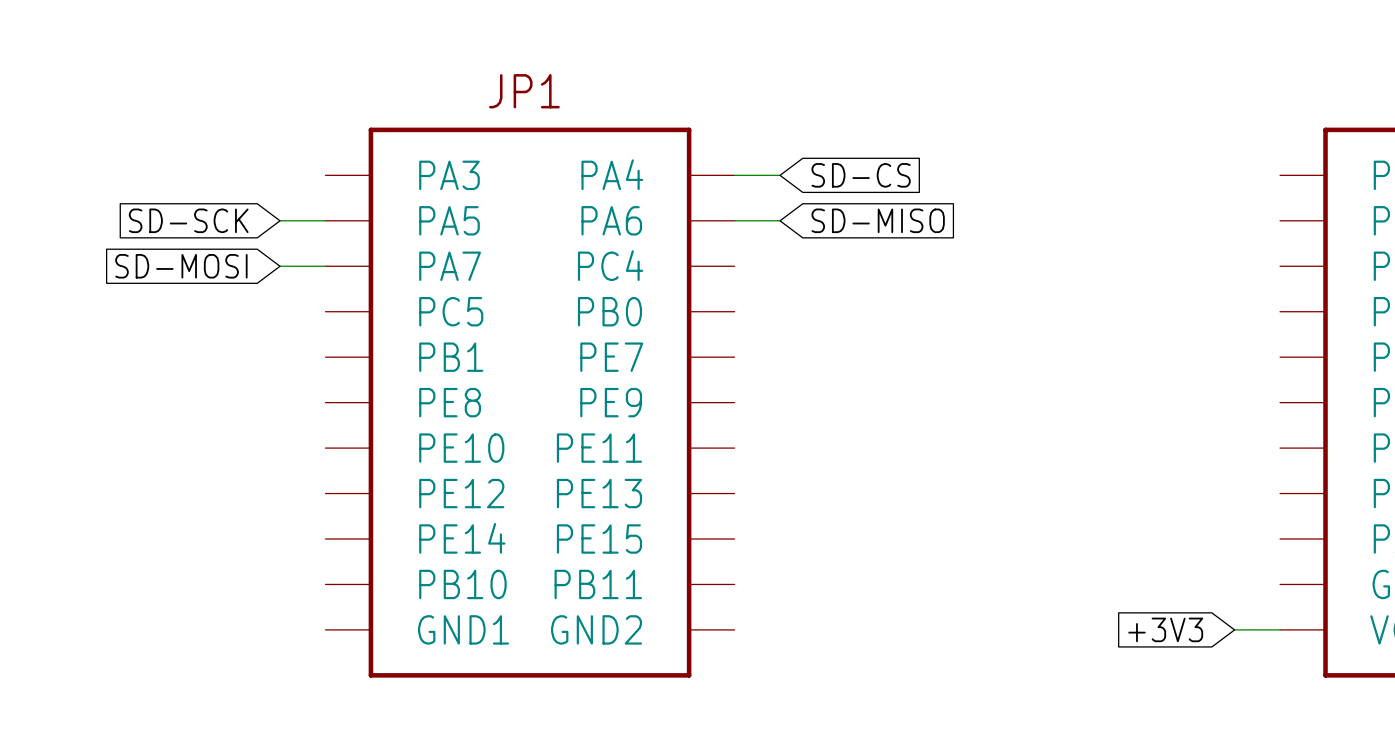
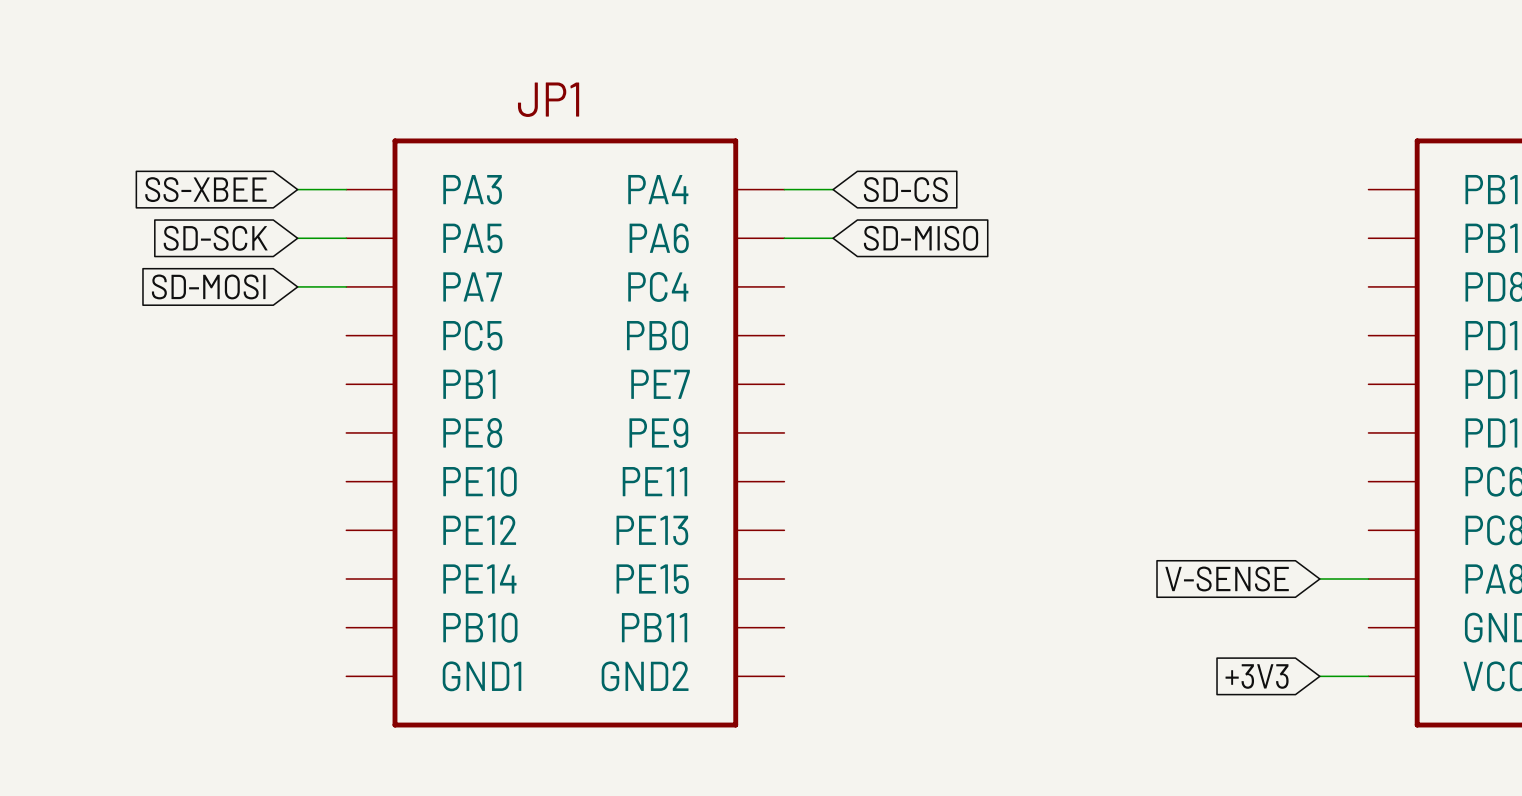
global label: none -> SS-XBEE (205, 189)
wire: none -> (297, 189) (346, 189)
global label: none -> V-SENSE (1227, 579)
wire: none -> (1319, 579) (1368, 579)

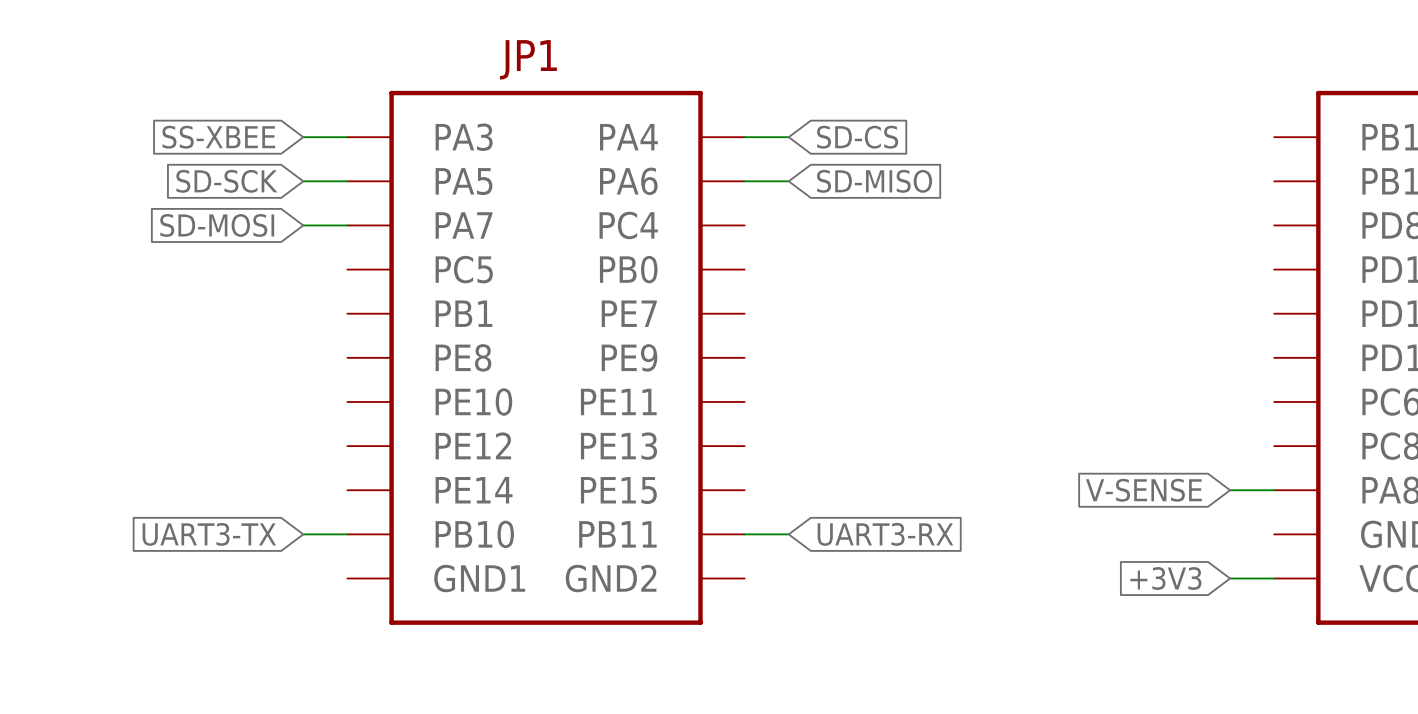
global label: none -> UART3-TX (209, 534)
wire: none -> (303, 534) (347, 534)
wire: none -> (744, 534) (788, 534)
global label: none -> UART3-RX (885, 534)

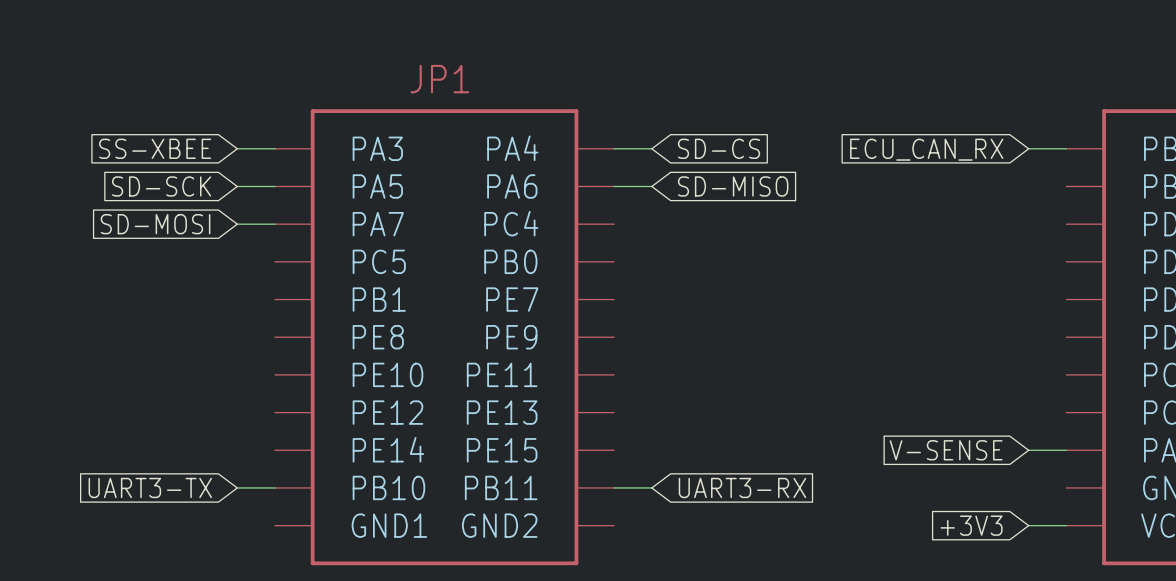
wire: none -> (1028, 148) (1066, 148)
global label: none -> ECU_CAN_RX (926, 149)

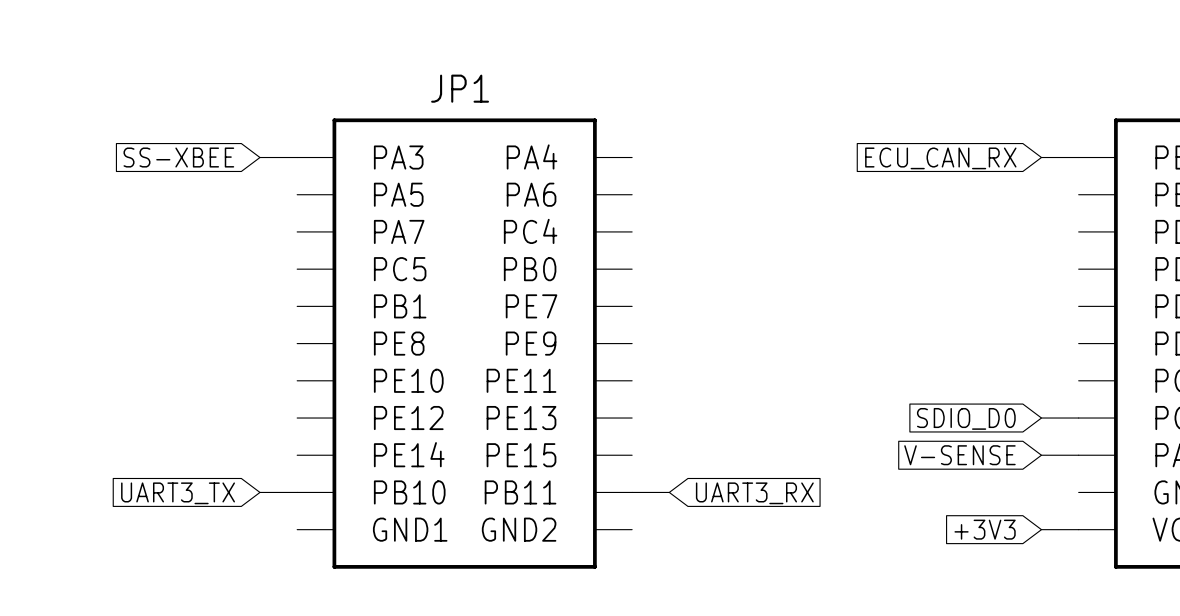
wire: (614, 148) (651, 148) -> none
global label: SD-CS (719, 148) -> none
global label: SD-SCK (161, 186) -> none
wire: (237, 186) (274, 186) -> none
wire: (614, 186) (651, 186) -> none
global label: SD-MISO (733, 186) -> none
global label: SD-MOSI (155, 224) -> none
wire: (237, 224) (274, 224) -> none
wire: none -> (1041, 418) (1078, 418)
global label: none -> SDIO_D0 (966, 418)
global label: UART3-TX (150, 487) -> UART3_TX (178, 493)
global label: UART3-RX (742, 487) -> UART3_RX (754, 493)

